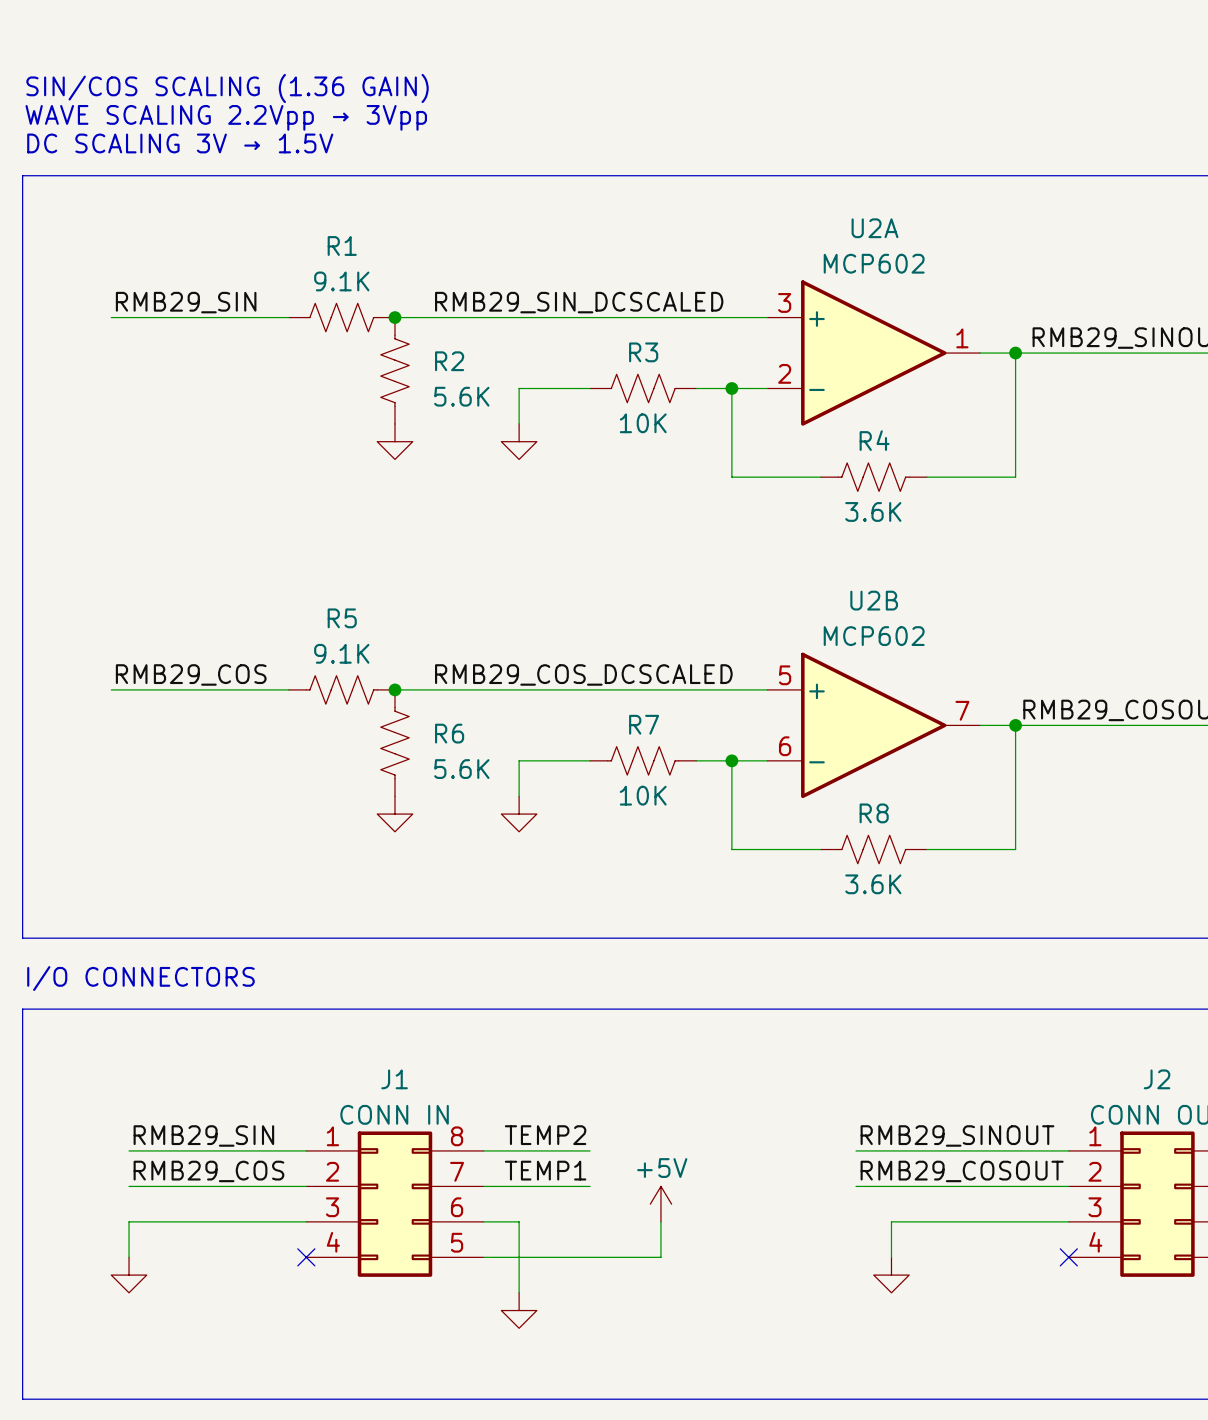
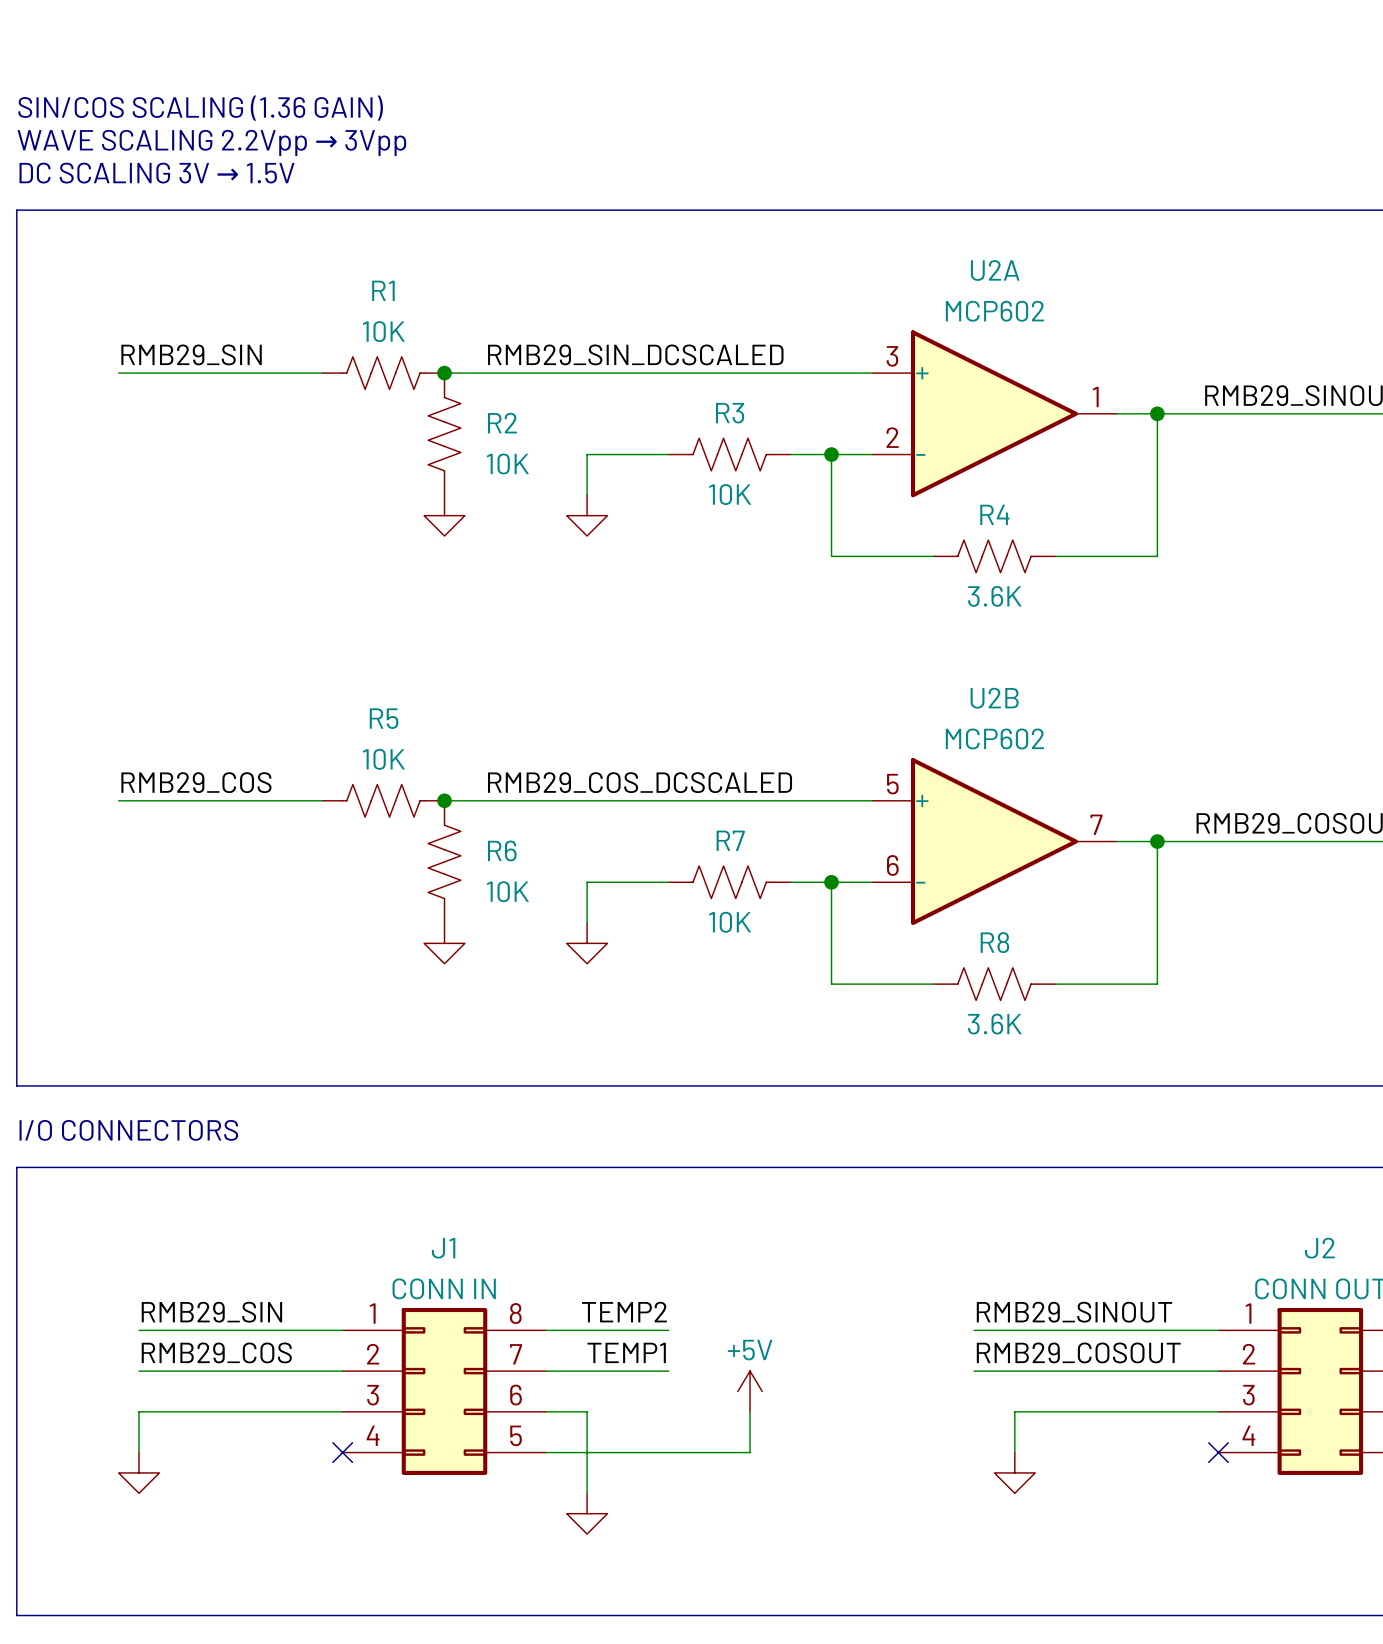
R1 value: 9.1K (341, 281) -> 10K (383, 331)
R2 value: 5.6K (461, 396) -> 10K (507, 463)
R5 value: 9.1K (341, 653) -> 10K (383, 759)
R6 value: 5.6K (461, 769) -> 10K (507, 891)

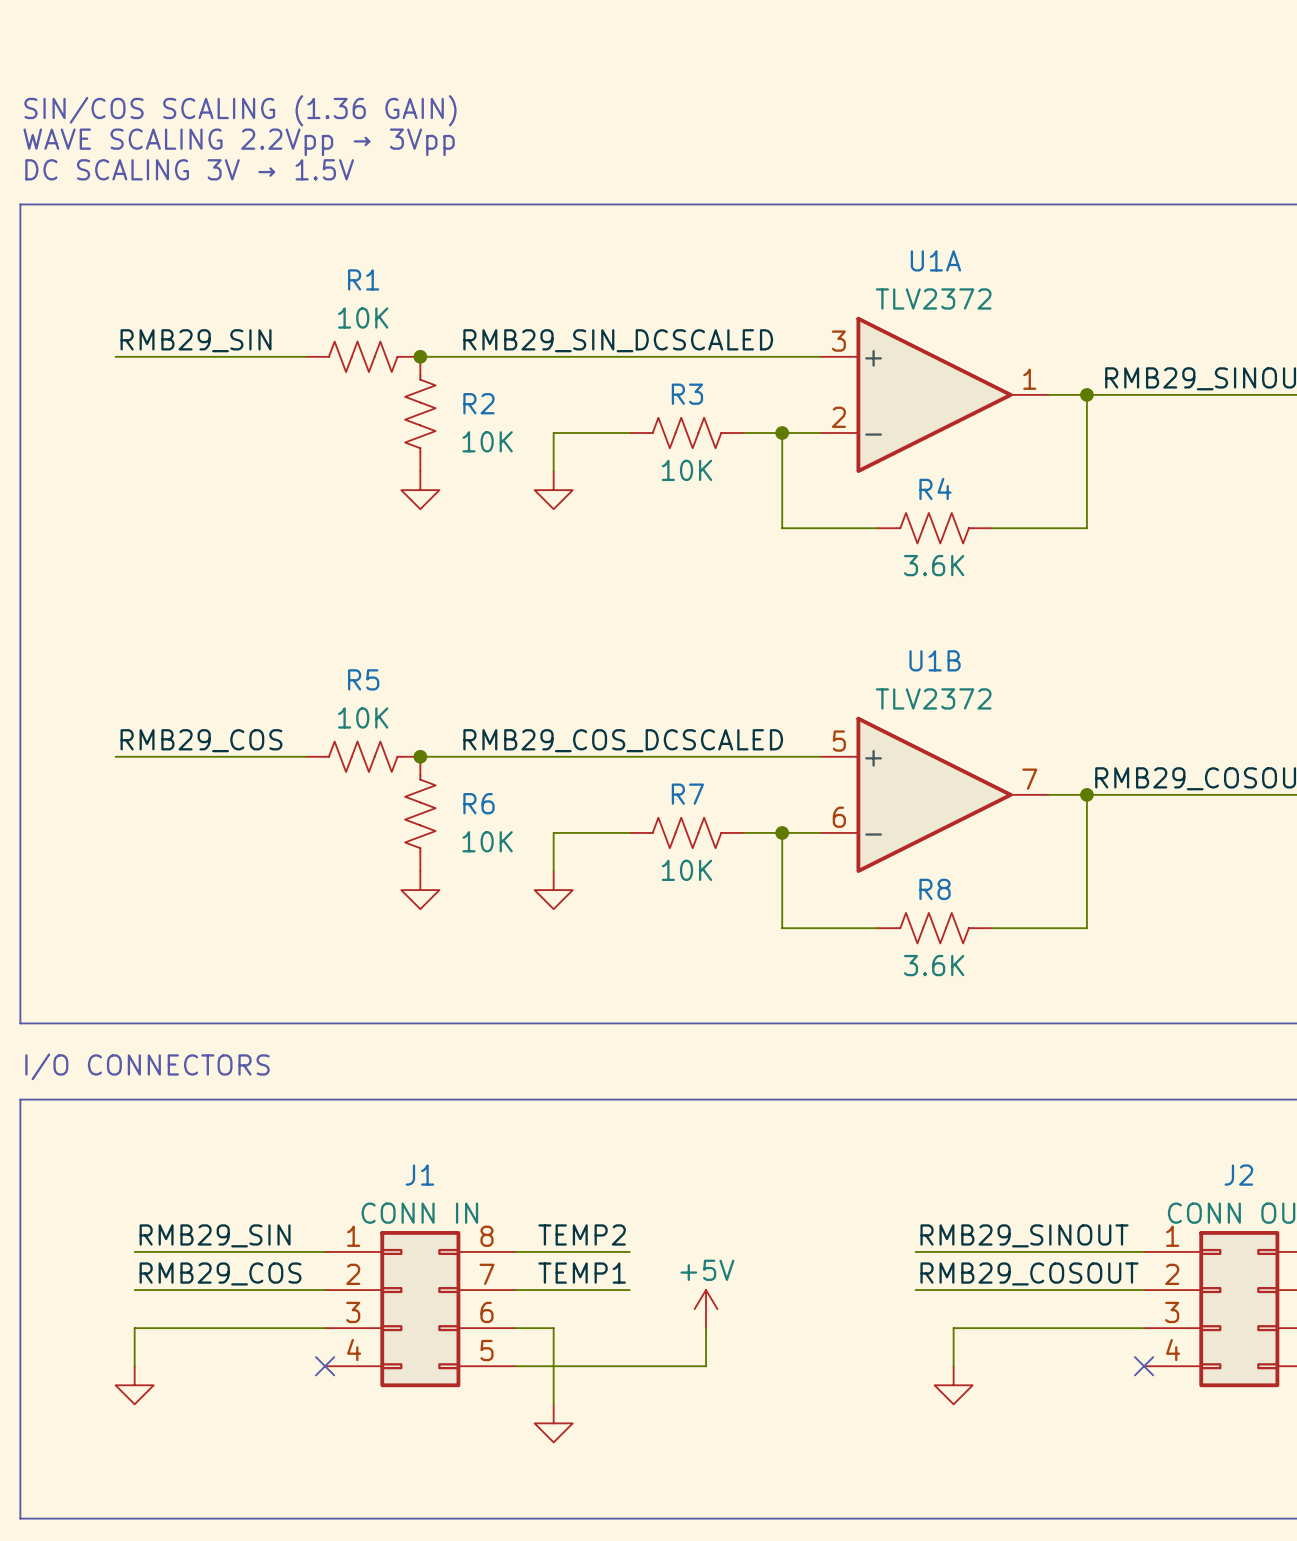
U2A name: U2A (995, 270) -> U1A (935, 260)
U2A value: MCP602 (994, 311) -> TLV2372 (933, 298)
U2B name: U2B (994, 698) -> U1B (935, 660)
U2B value: MCP602 (994, 738) -> TLV2372 (933, 698)

